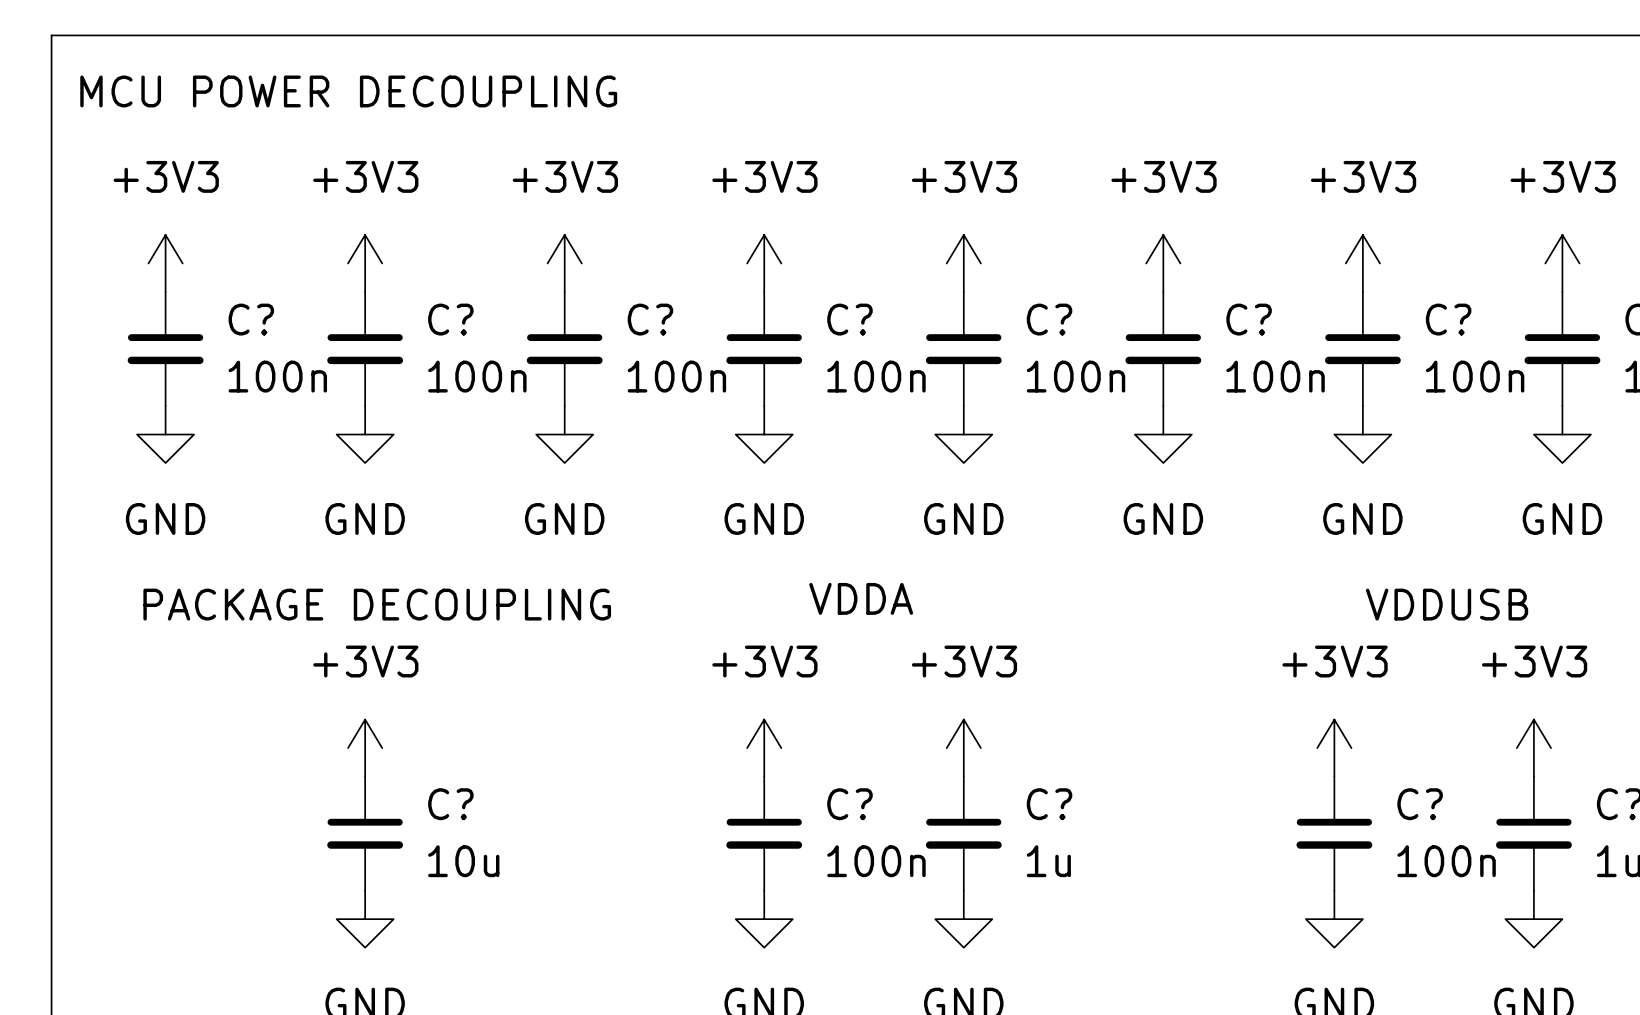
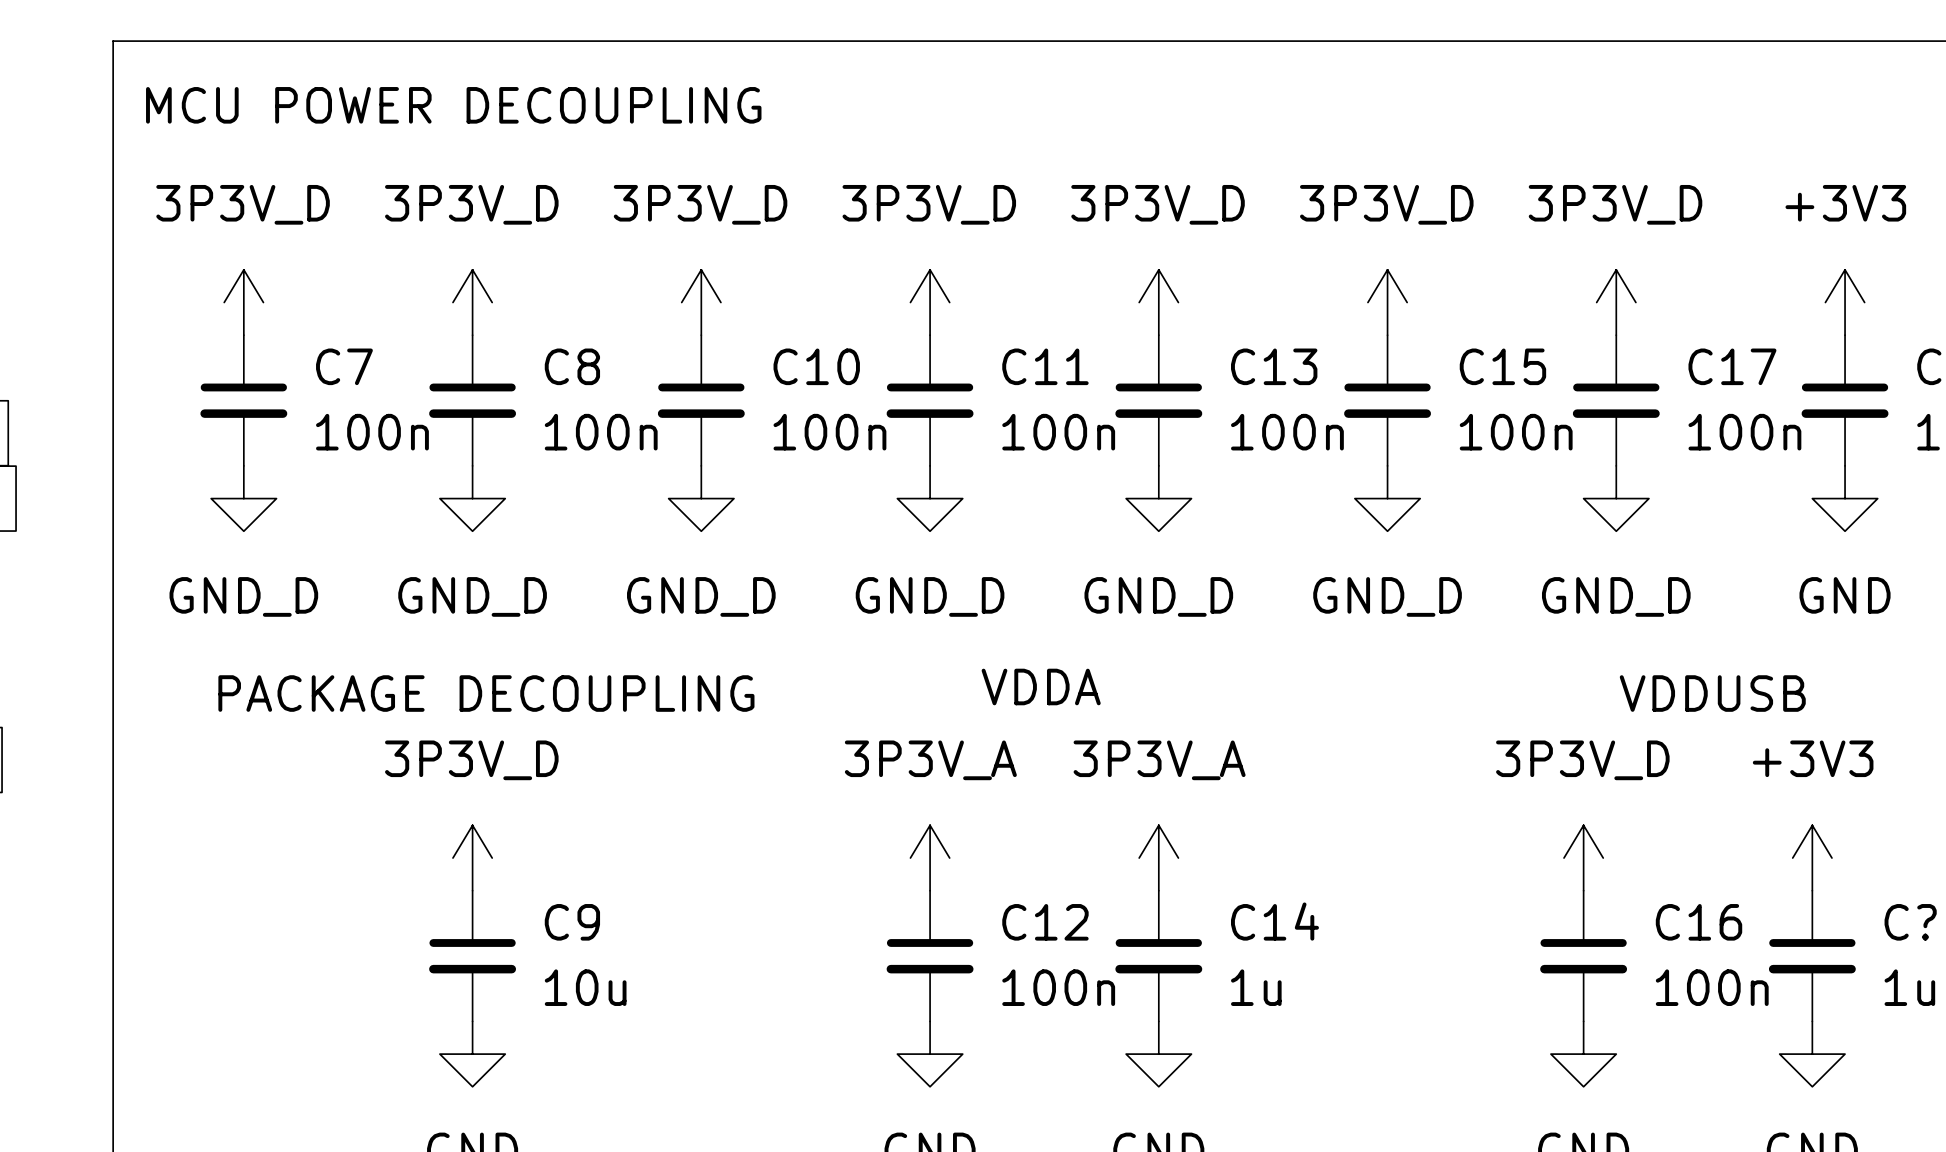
power symbol: +3V3 (165, 263) -> 3P3V_D (243, 302)
power symbol: +3V3 (365, 263) -> 3P3V_D (472, 302)
power symbol: +3V3 (564, 263) -> 3P3V_D (701, 302)
power symbol: +3V3 (764, 263) -> 3P3V_D (930, 302)
power symbol: +3V3 (963, 263) -> 3P3V_D (1158, 302)
power symbol: +3V3 (1163, 263) -> 3P3V_D (1387, 302)
power symbol: +3V3 (1362, 263) -> 3P3V_D (1616, 302)
C? name: C? (251, 319) -> C7 (344, 366)
C? name: C? (450, 319) -> C8 (572, 366)
C? name: C? (650, 319) -> C10 (816, 366)
C? name: C? (849, 319) -> C11 (1045, 366)
C? name: C? (1049, 319) -> C13 (1274, 366)
C? name: C? (1249, 319) -> C15 (1502, 366)
C? name: C? (1448, 319) -> C17 (1732, 366)
power symbol: GND (165, 434) -> GND_D (243, 498)
power symbol: GND (365, 434) -> GND_D (472, 498)
power symbol: GND (564, 434) -> GND_D (701, 498)
power symbol: GND (764, 434) -> GND_D (930, 498)
power symbol: GND (963, 434) -> GND_D (1158, 498)
power symbol: GND (1163, 434) -> GND_D (1387, 498)
power symbol: GND (1362, 434) -> GND_D (1616, 498)
power symbol: +3V3 (365, 748) -> 3P3V_D (472, 858)
power symbol: +3V3 (764, 748) -> 3P3V_A (930, 858)
power symbol: +3V3 (963, 748) -> 3P3V_A (1158, 858)
power symbol: +3V3 (1334, 748) -> 3P3V_D (1583, 858)
C? name: C? (450, 804) -> C9 (572, 922)
C? name: C? (849, 804) -> C12 (1045, 922)
C? name: C? (1049, 804) -> C14 (1274, 921)
C? name: C? (1420, 804) -> C16 (1699, 922)

